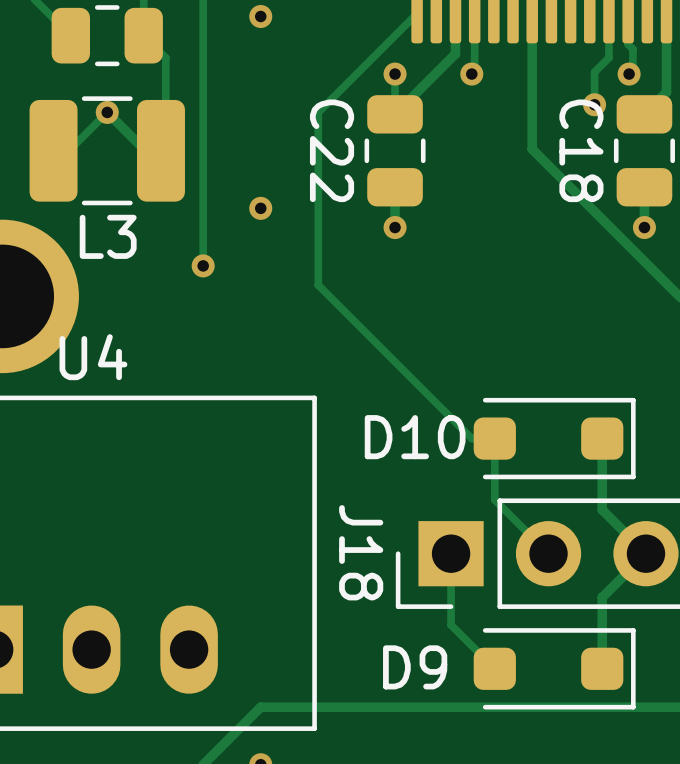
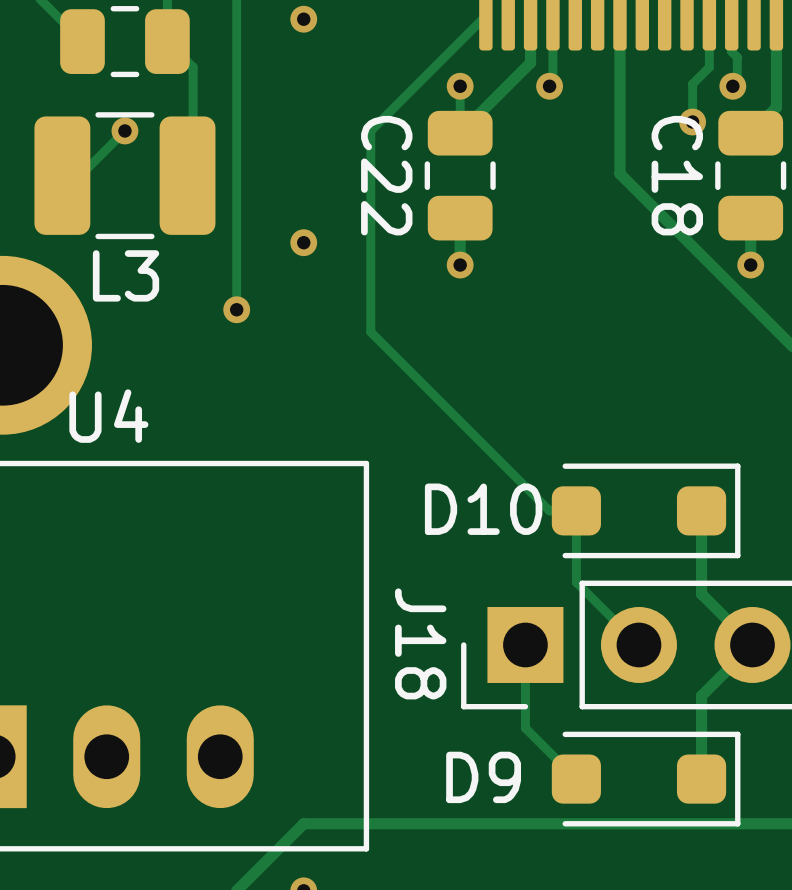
track: (107, 112) (149, 154) -> none

